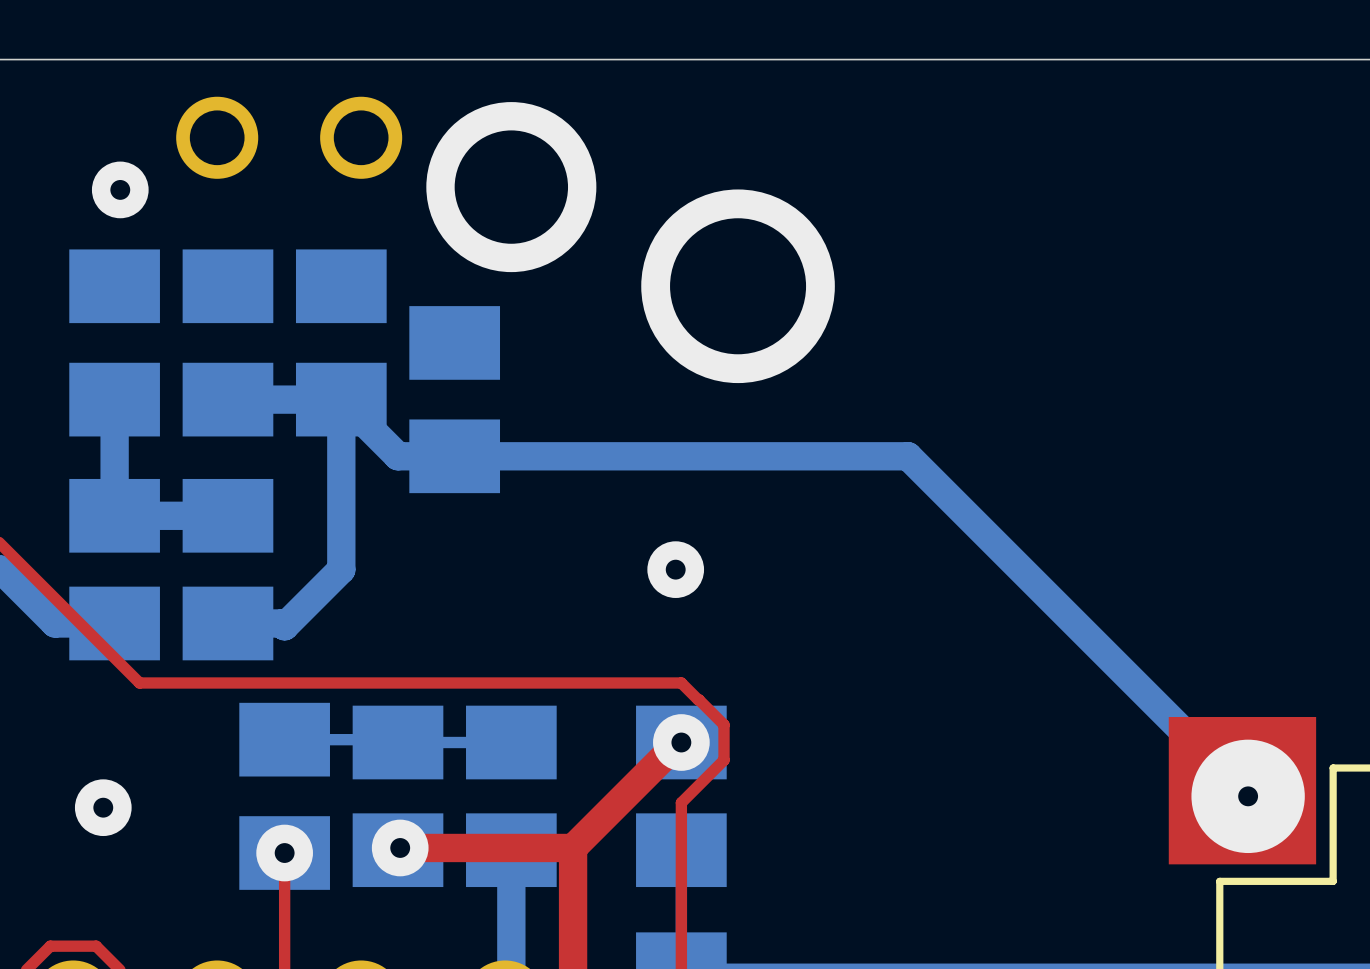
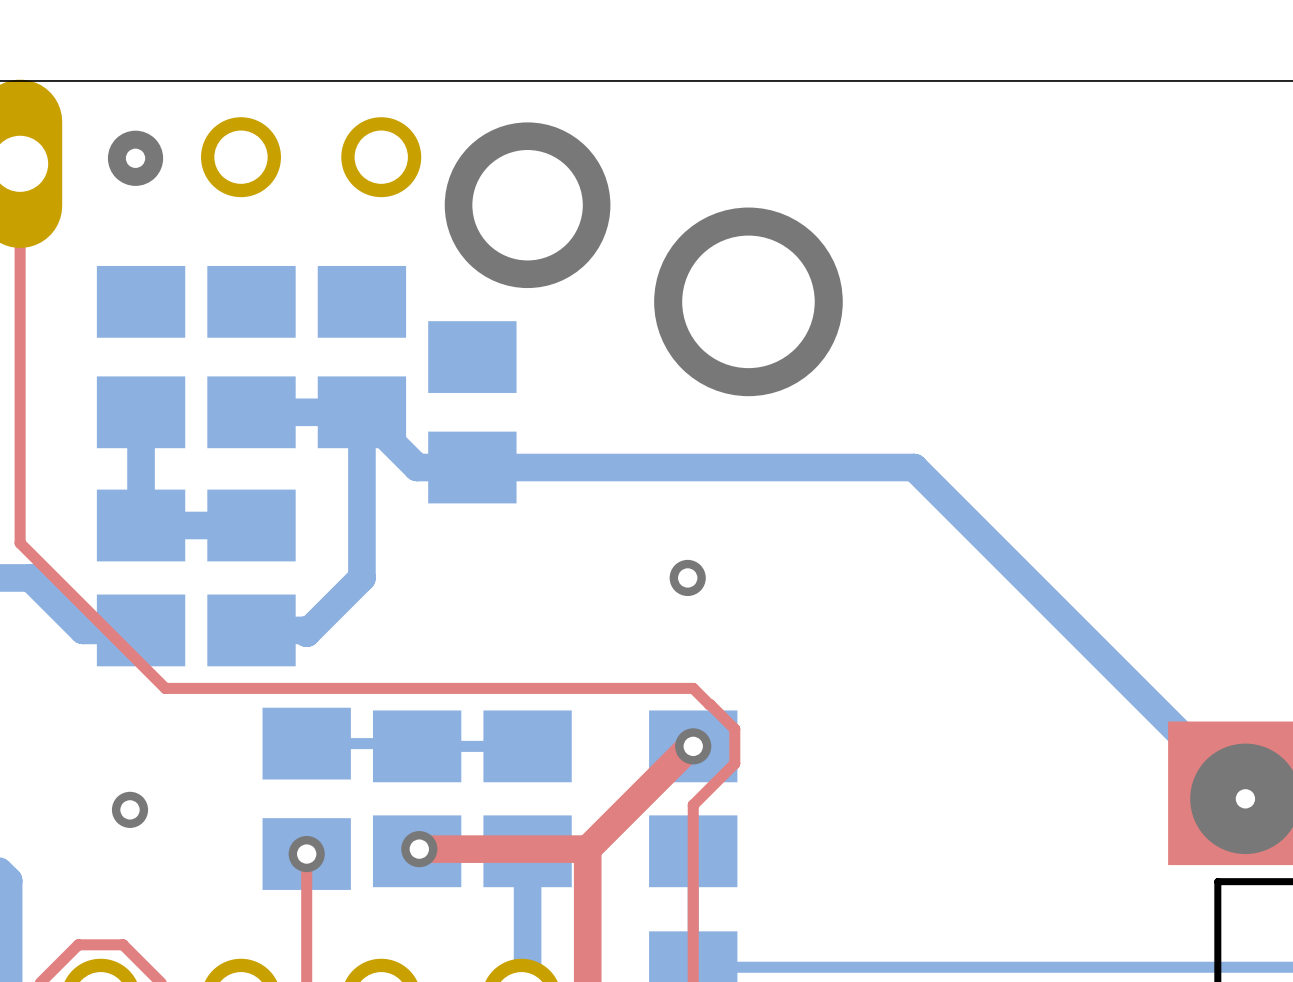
via position: (120, 189) -> (135, 158)
via size: [647, 541, 705, 598] -> [669, 559, 706, 597]
via size: [653, 714, 710, 771] -> [675, 728, 712, 765]
via size: [74, 779, 132, 837] -> [111, 791, 149, 828]
via size: [371, 819, 429, 877] -> [401, 831, 438, 868]
via size: [256, 824, 313, 882] -> [288, 835, 325, 873]

